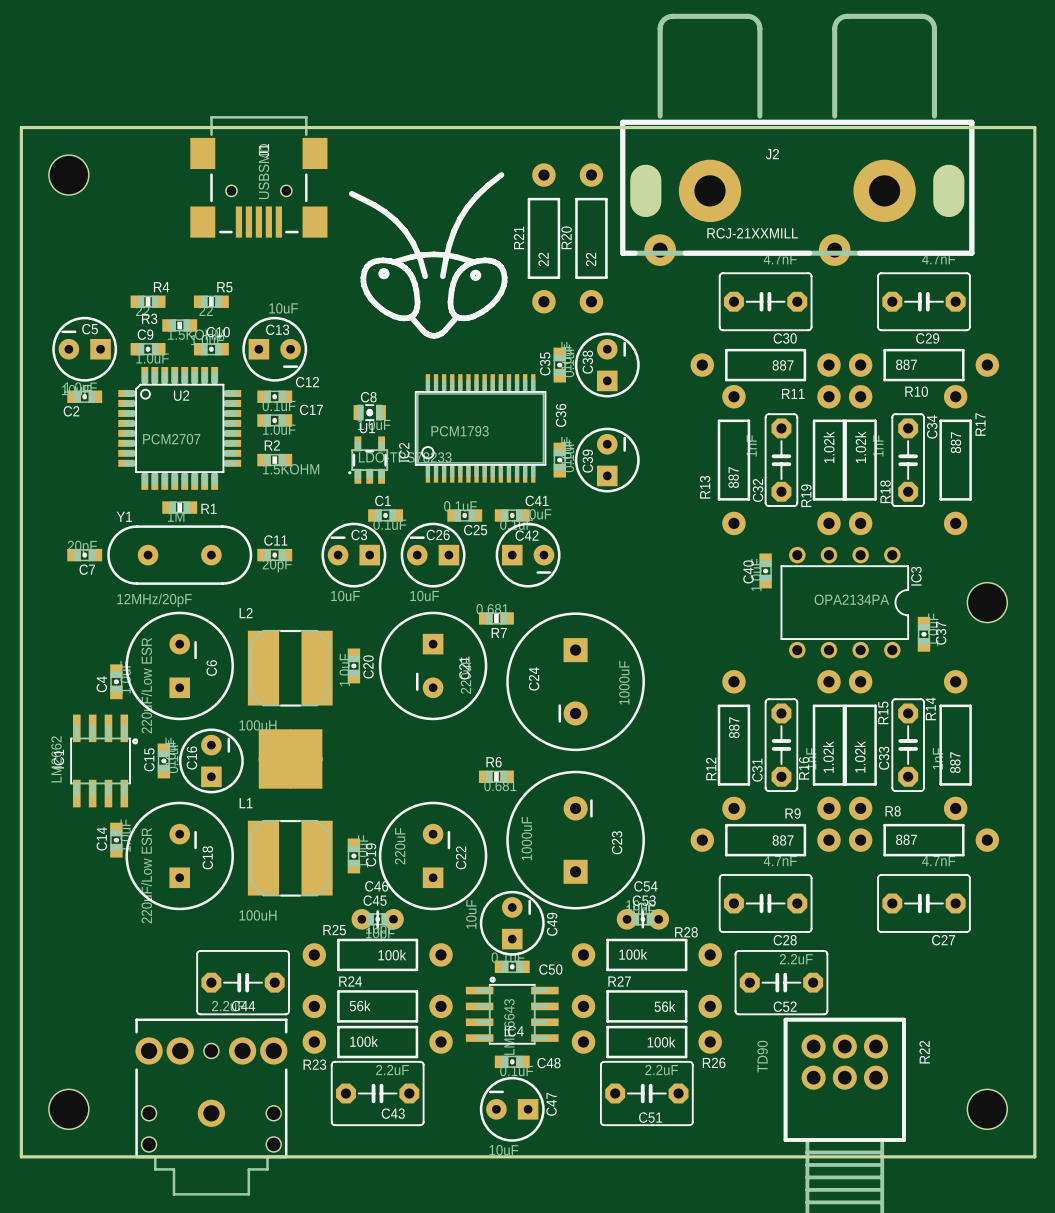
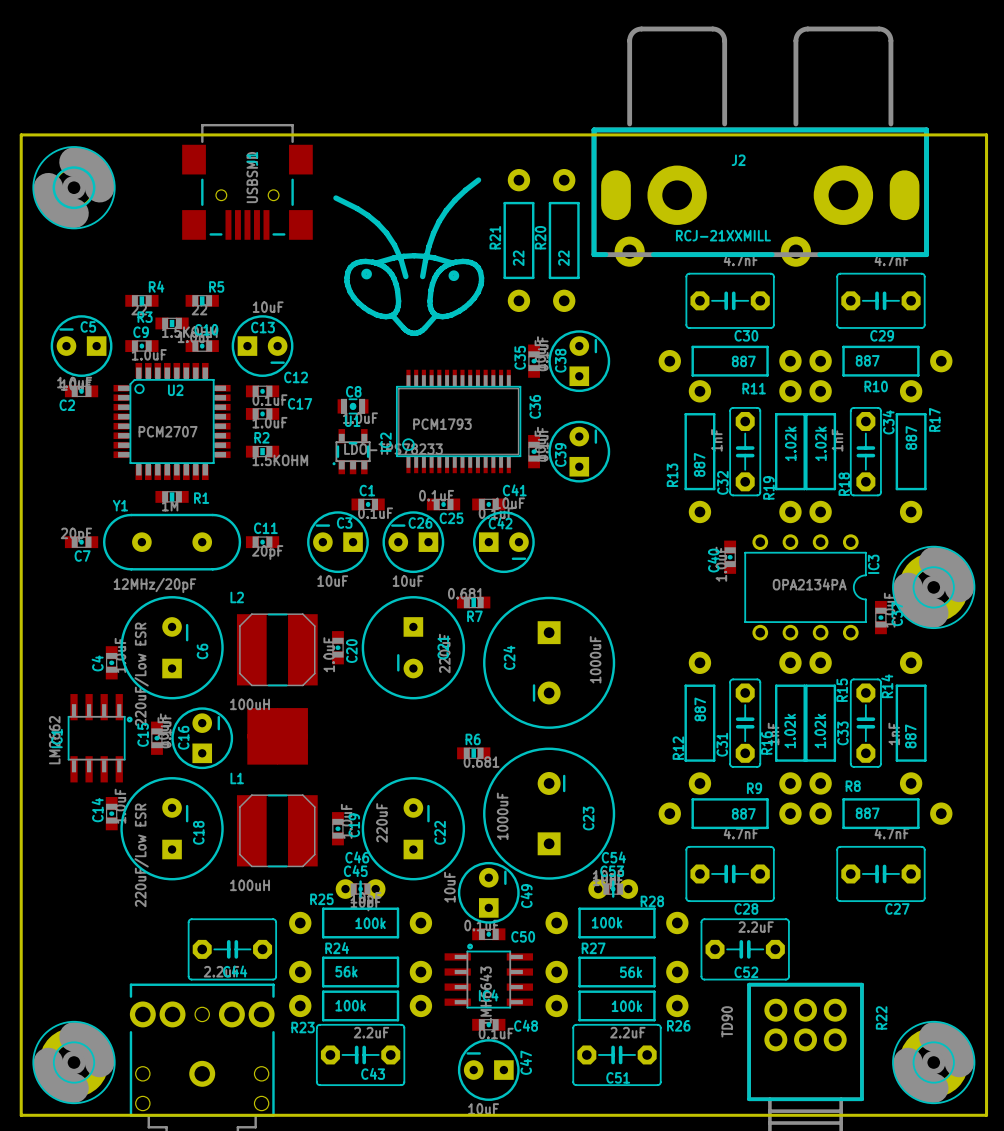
hole: (68, 175) -> none
part: none -> (74, 187)
part: none -> (933, 587)
hole: (987, 602) -> none
part: none -> (74, 1062)
part: none -> (933, 1062)
hole: (68, 1109) -> none
hole: (987, 1109) -> none

